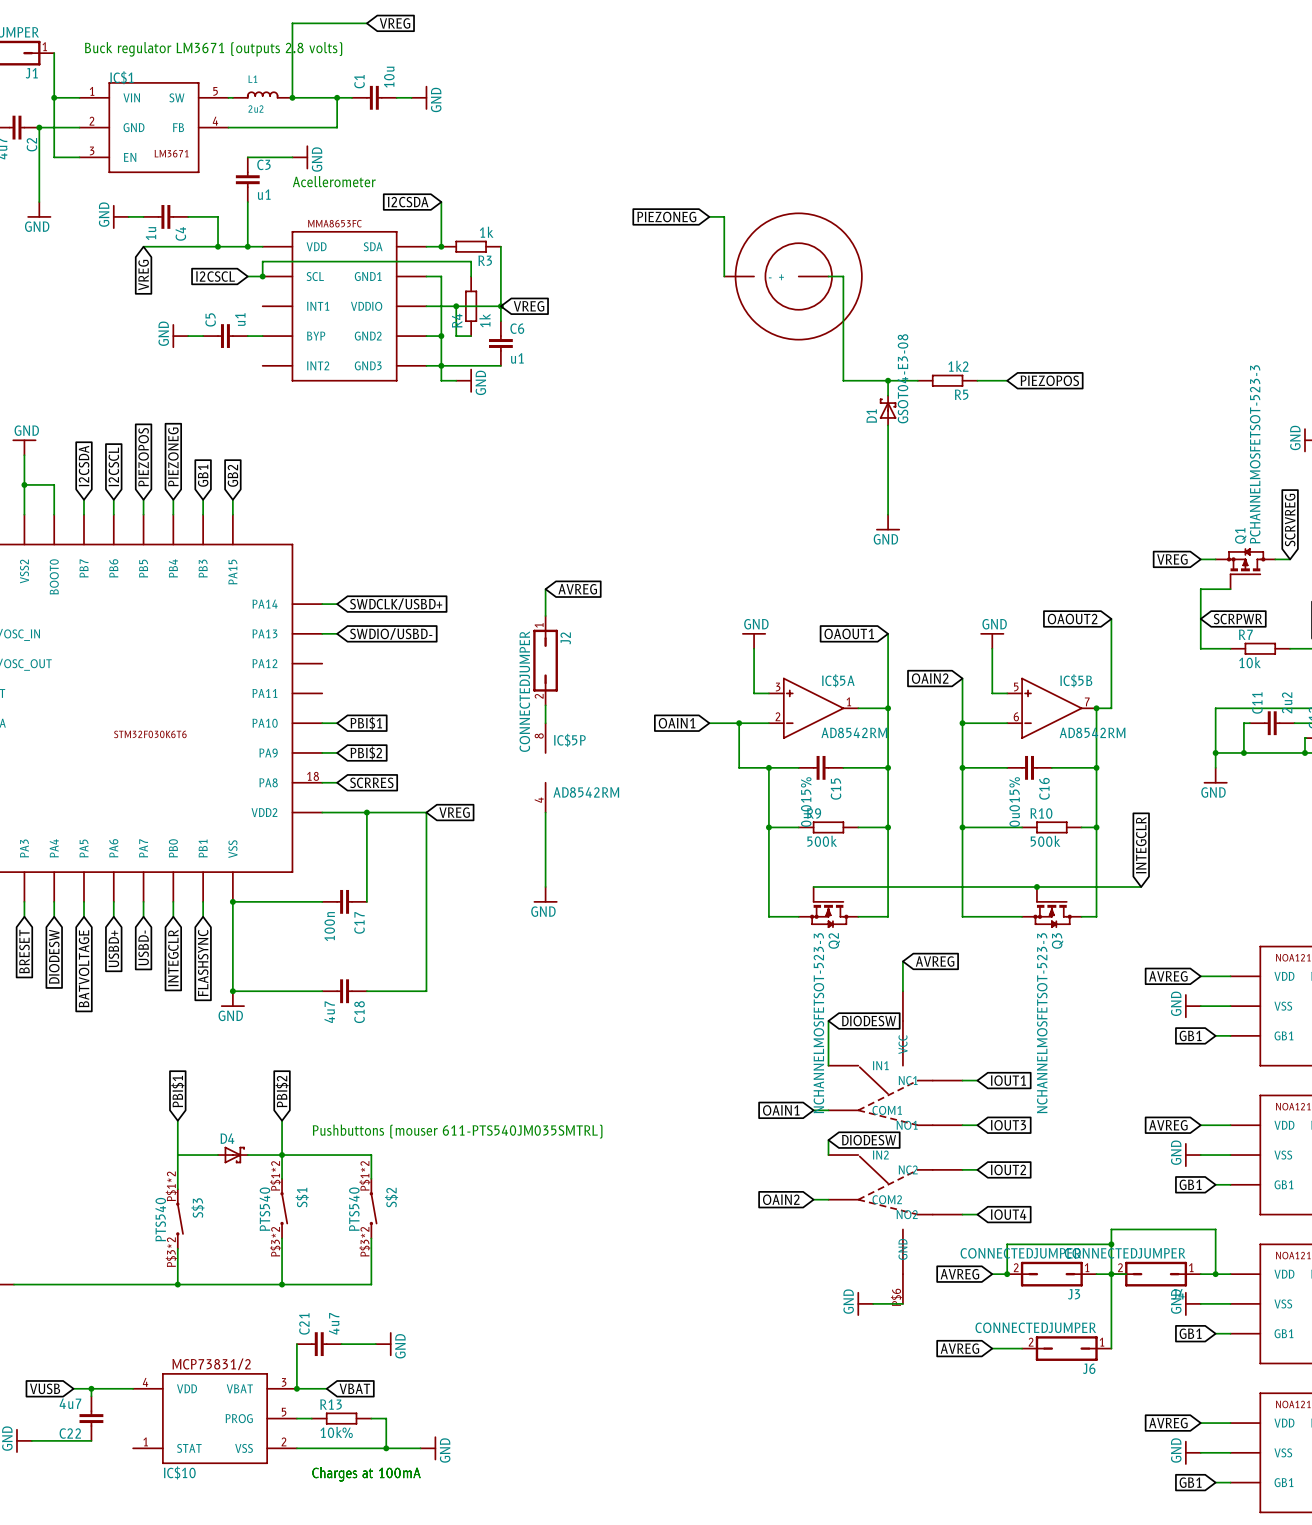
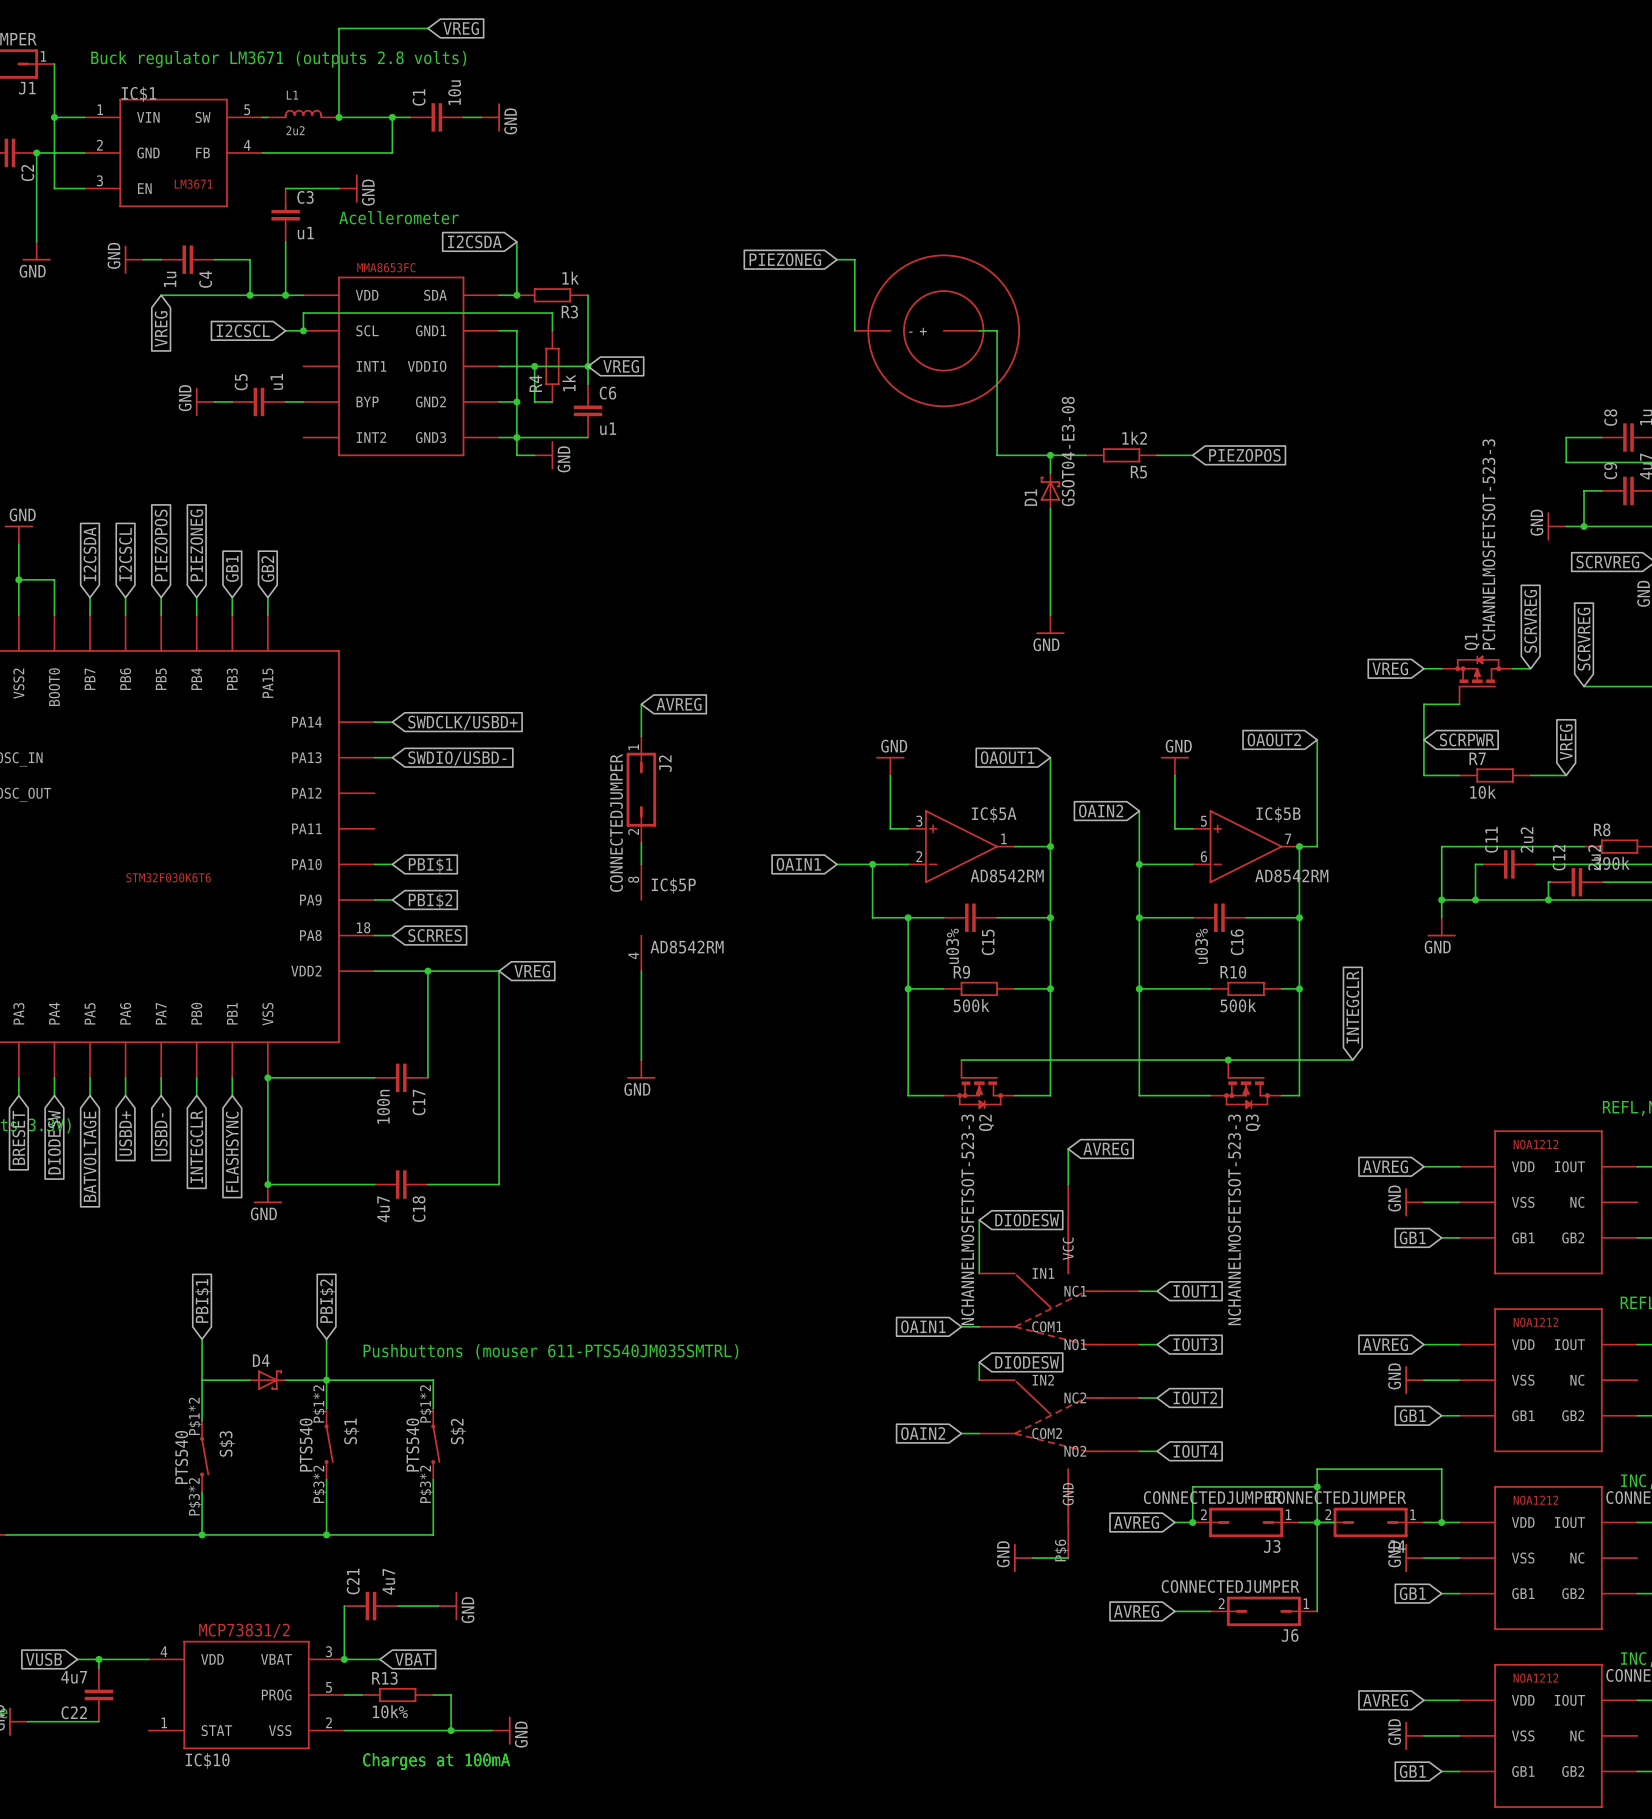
C15 value: 0u015% (806, 802) -> u03% (952, 946)
C16 value: 0u015% (1014, 802) -> u03% (1201, 946)

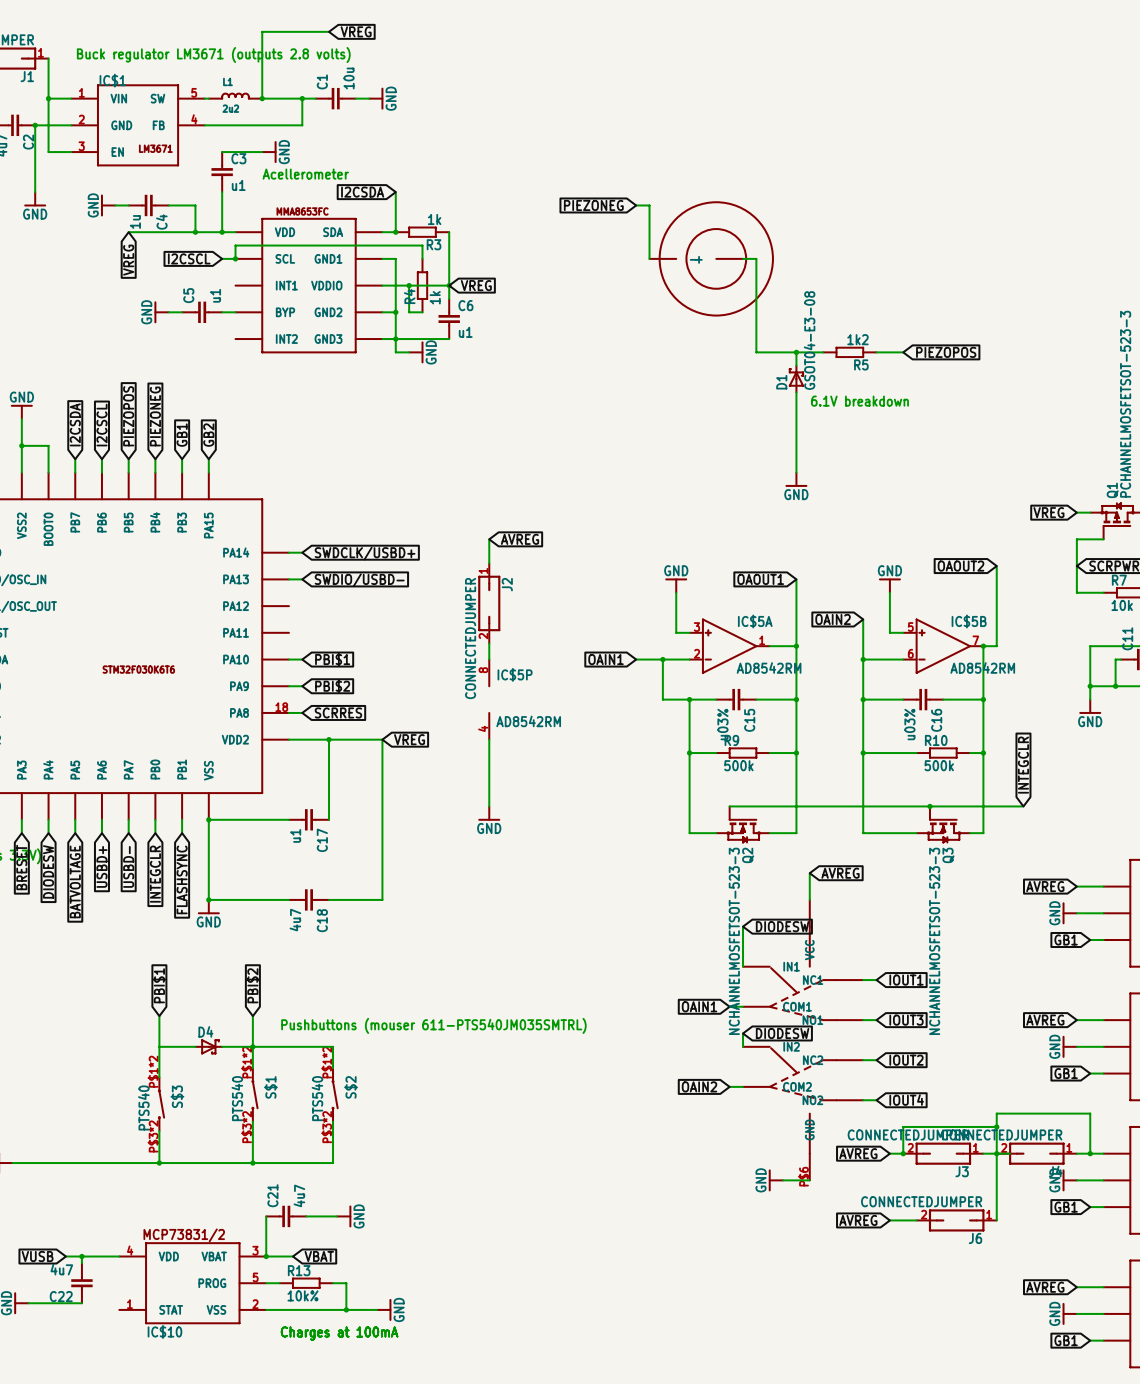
text: none -> 6.1V breakdown (859, 401)
C17 value: 100n (383, 1106) -> u1 (295, 835)

